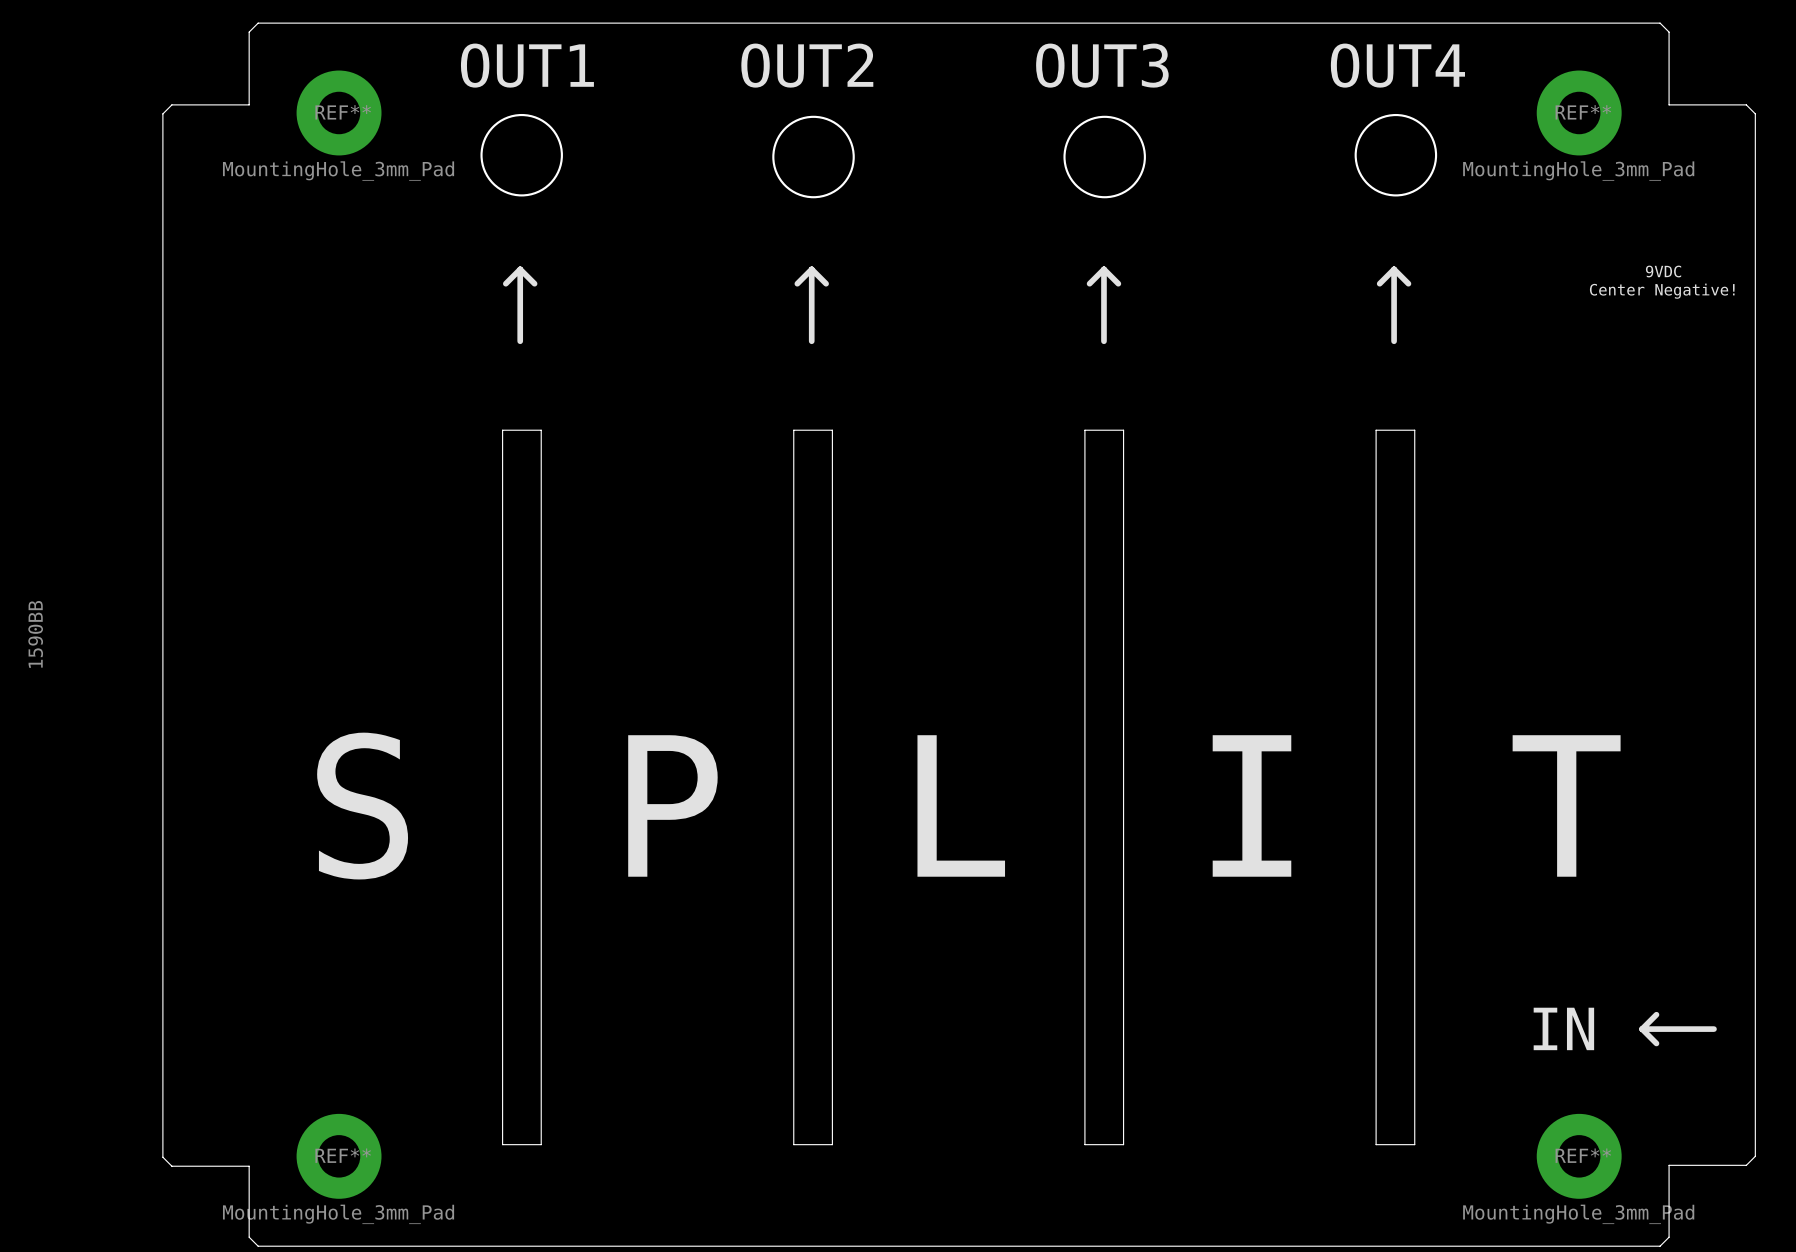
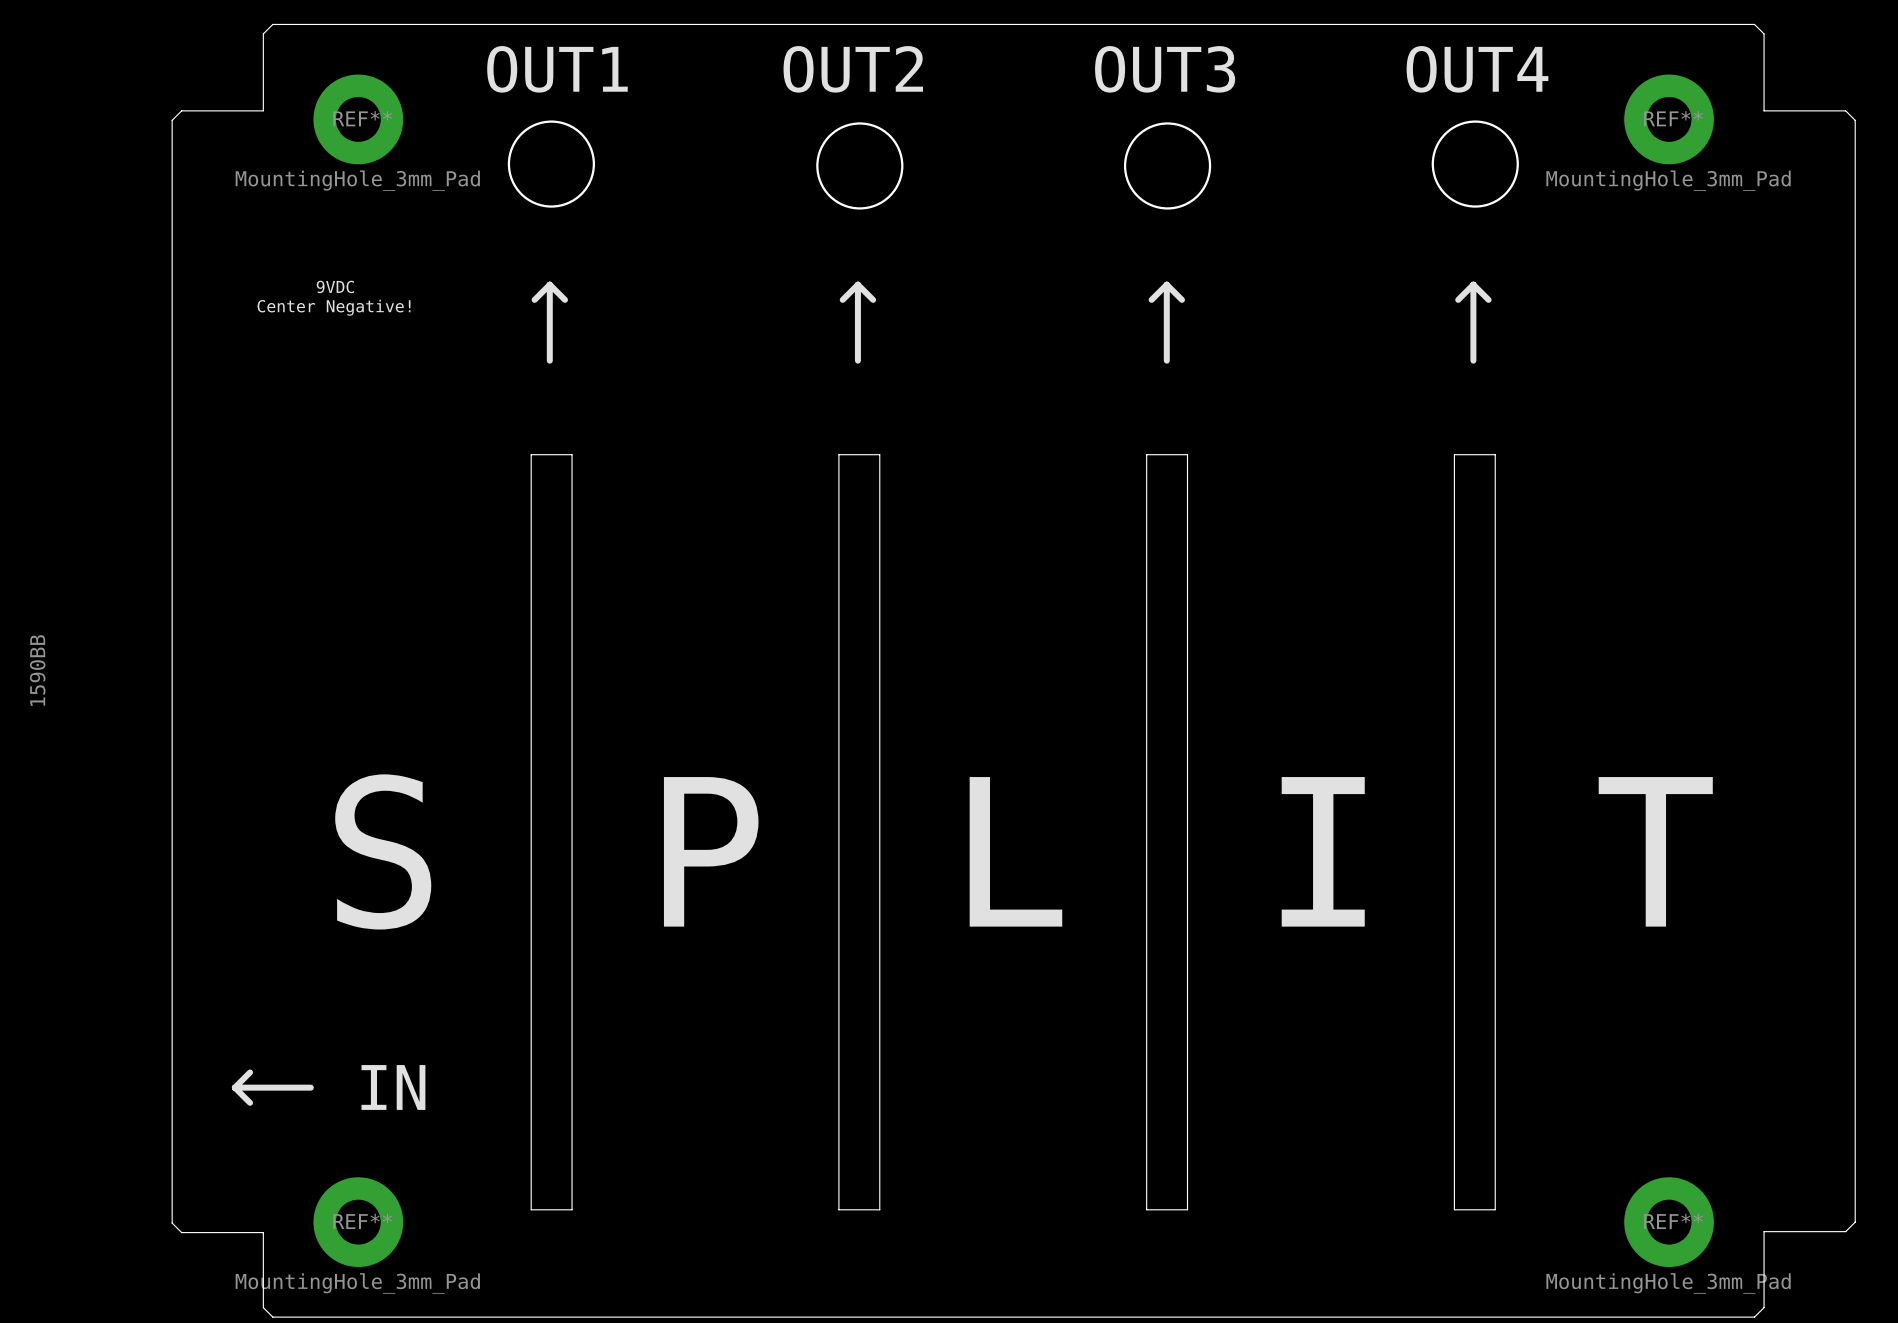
text: none -> 9VDC (335, 286)
text: 9VDC (1663, 271) -> none
text: none -> Center Negative! (334, 307)
text: Center Negative! (1662, 291) -> none
line: none -> (250, 1072) (234, 1087)
line: (1656, 1014) (1642, 1029) -> none
text: none -> IN (393, 1087)
text: IN (1563, 1028) -> none
line: none -> (234, 1087) (250, 1102)
line: none -> (234, 1087) (310, 1087)
line: (1642, 1029) (1656, 1043) -> none
line: (1642, 1029) (1713, 1029) -> none

